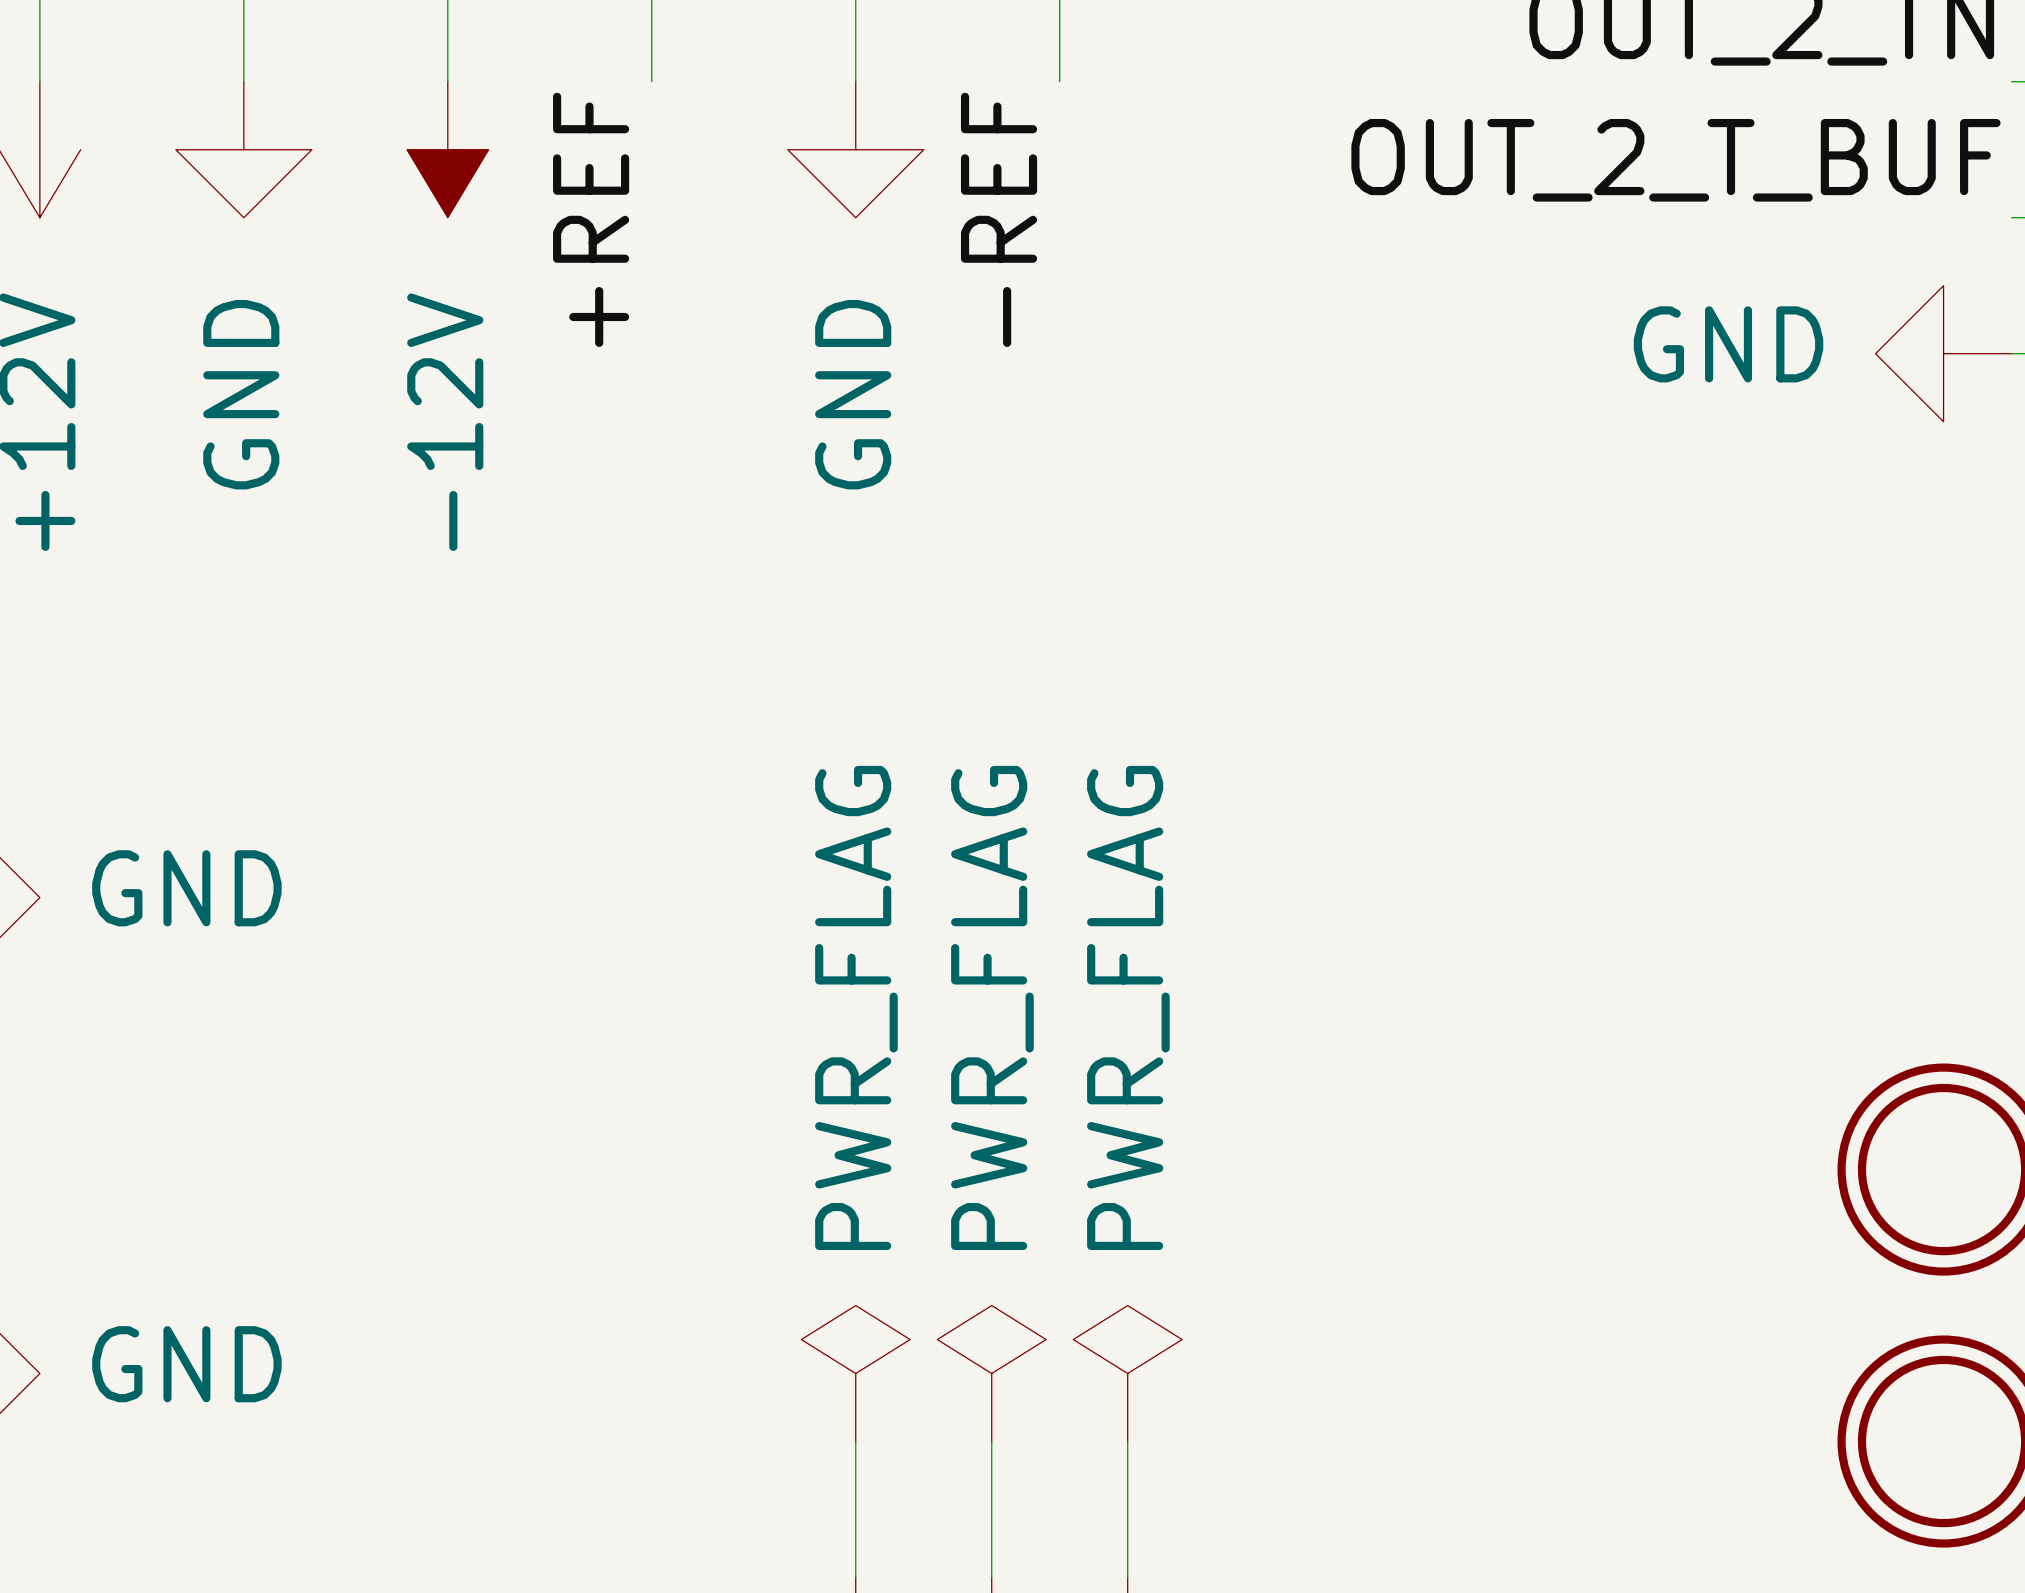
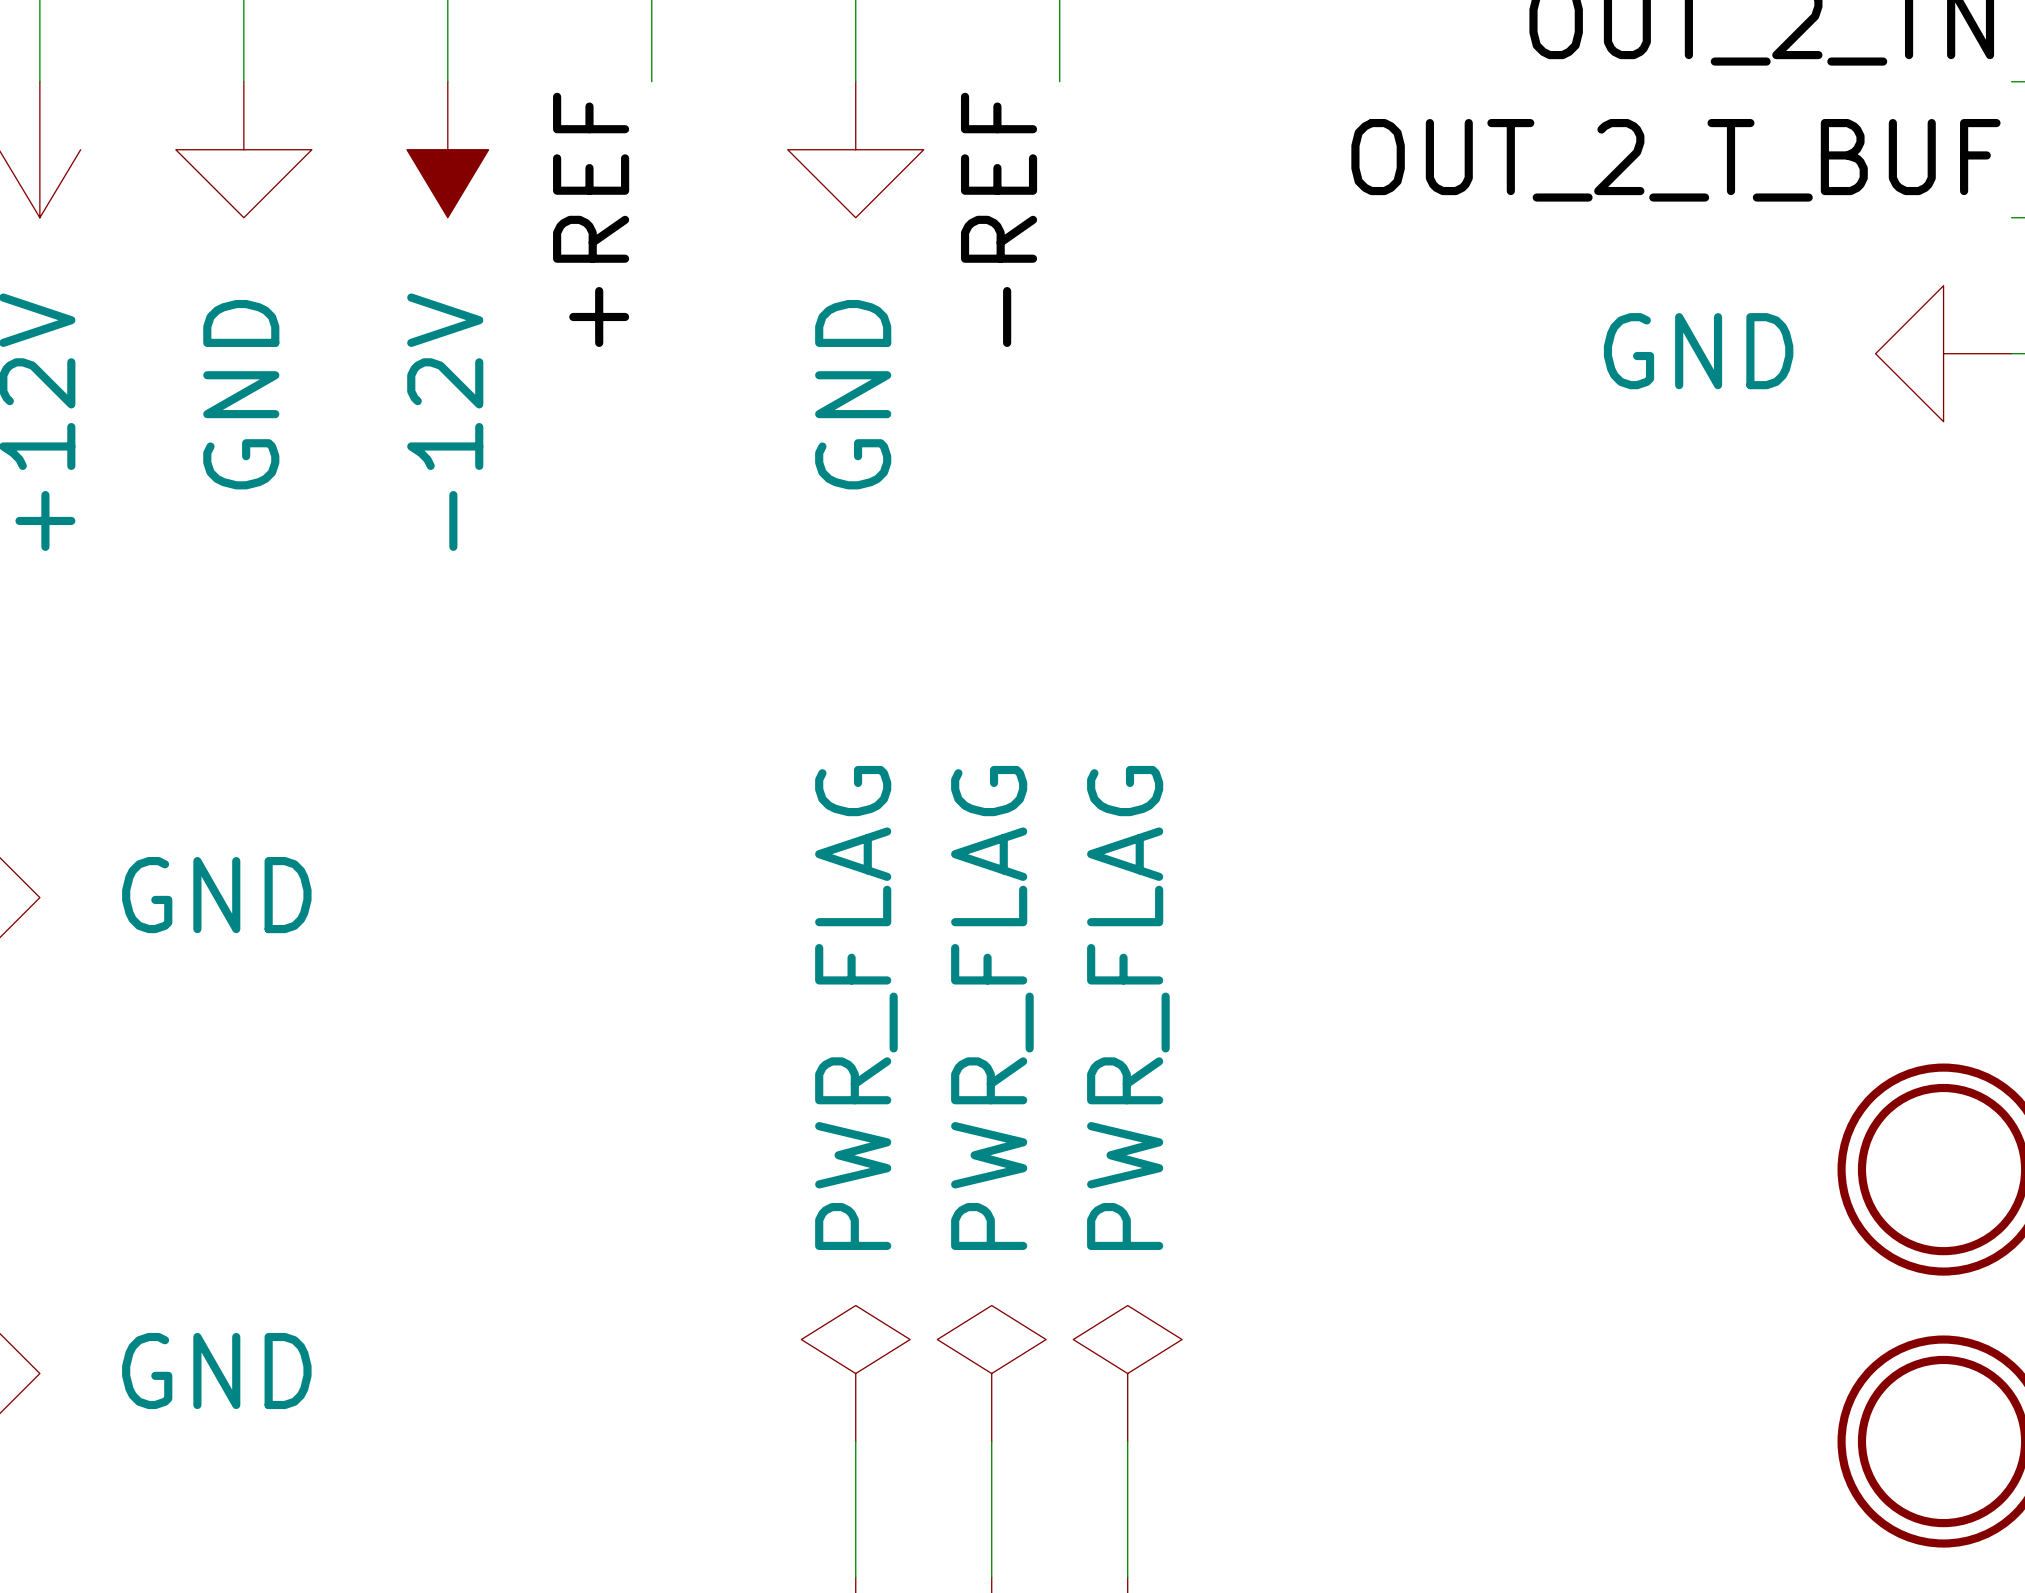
power symbol text position: GND (1728, 344) -> GND (1698, 351)
power symbol text position: GND (186, 888) -> GND (216, 895)
power symbol text position: GND (186, 1364) -> GND (216, 1371)

